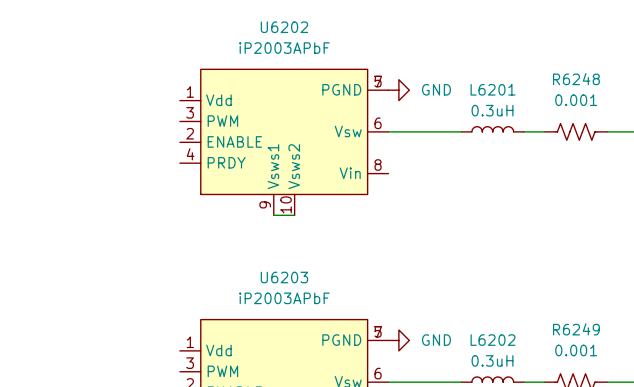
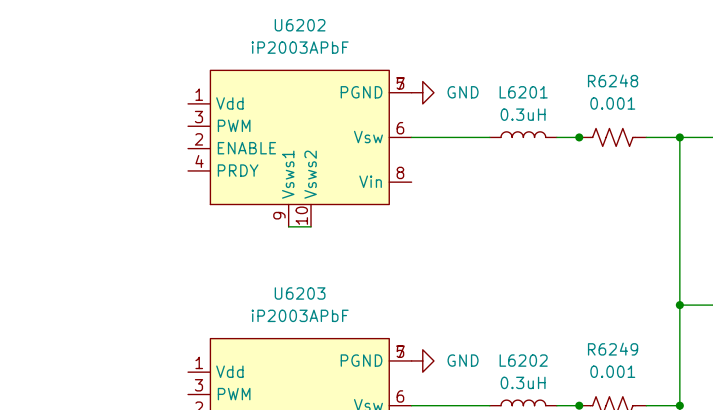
junction: none -> (579, 137)
junction: none -> (579, 405)

